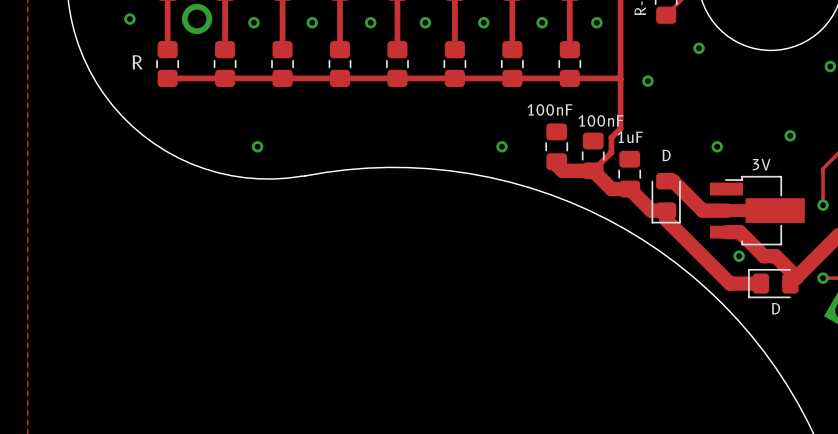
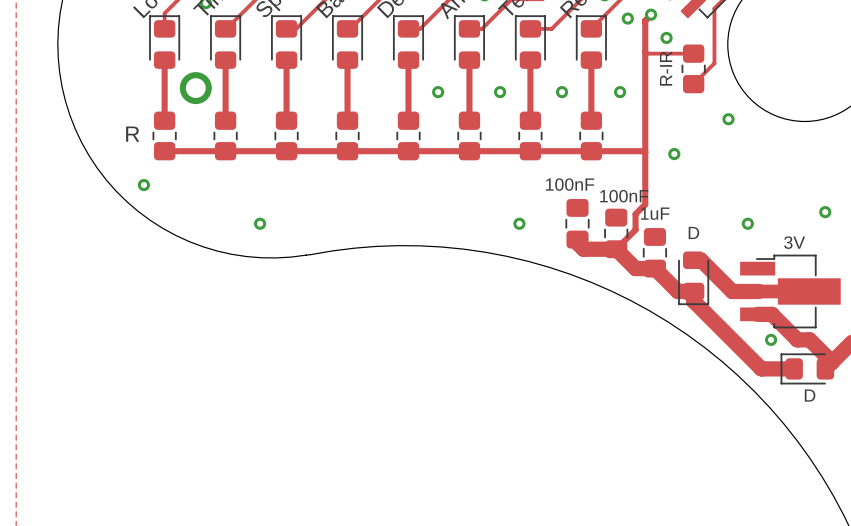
via: (129, 19) -> none
via: (253, 22) -> none
via: (312, 22) -> none
via: (370, 22) -> none
via: none -> (143, 185)

